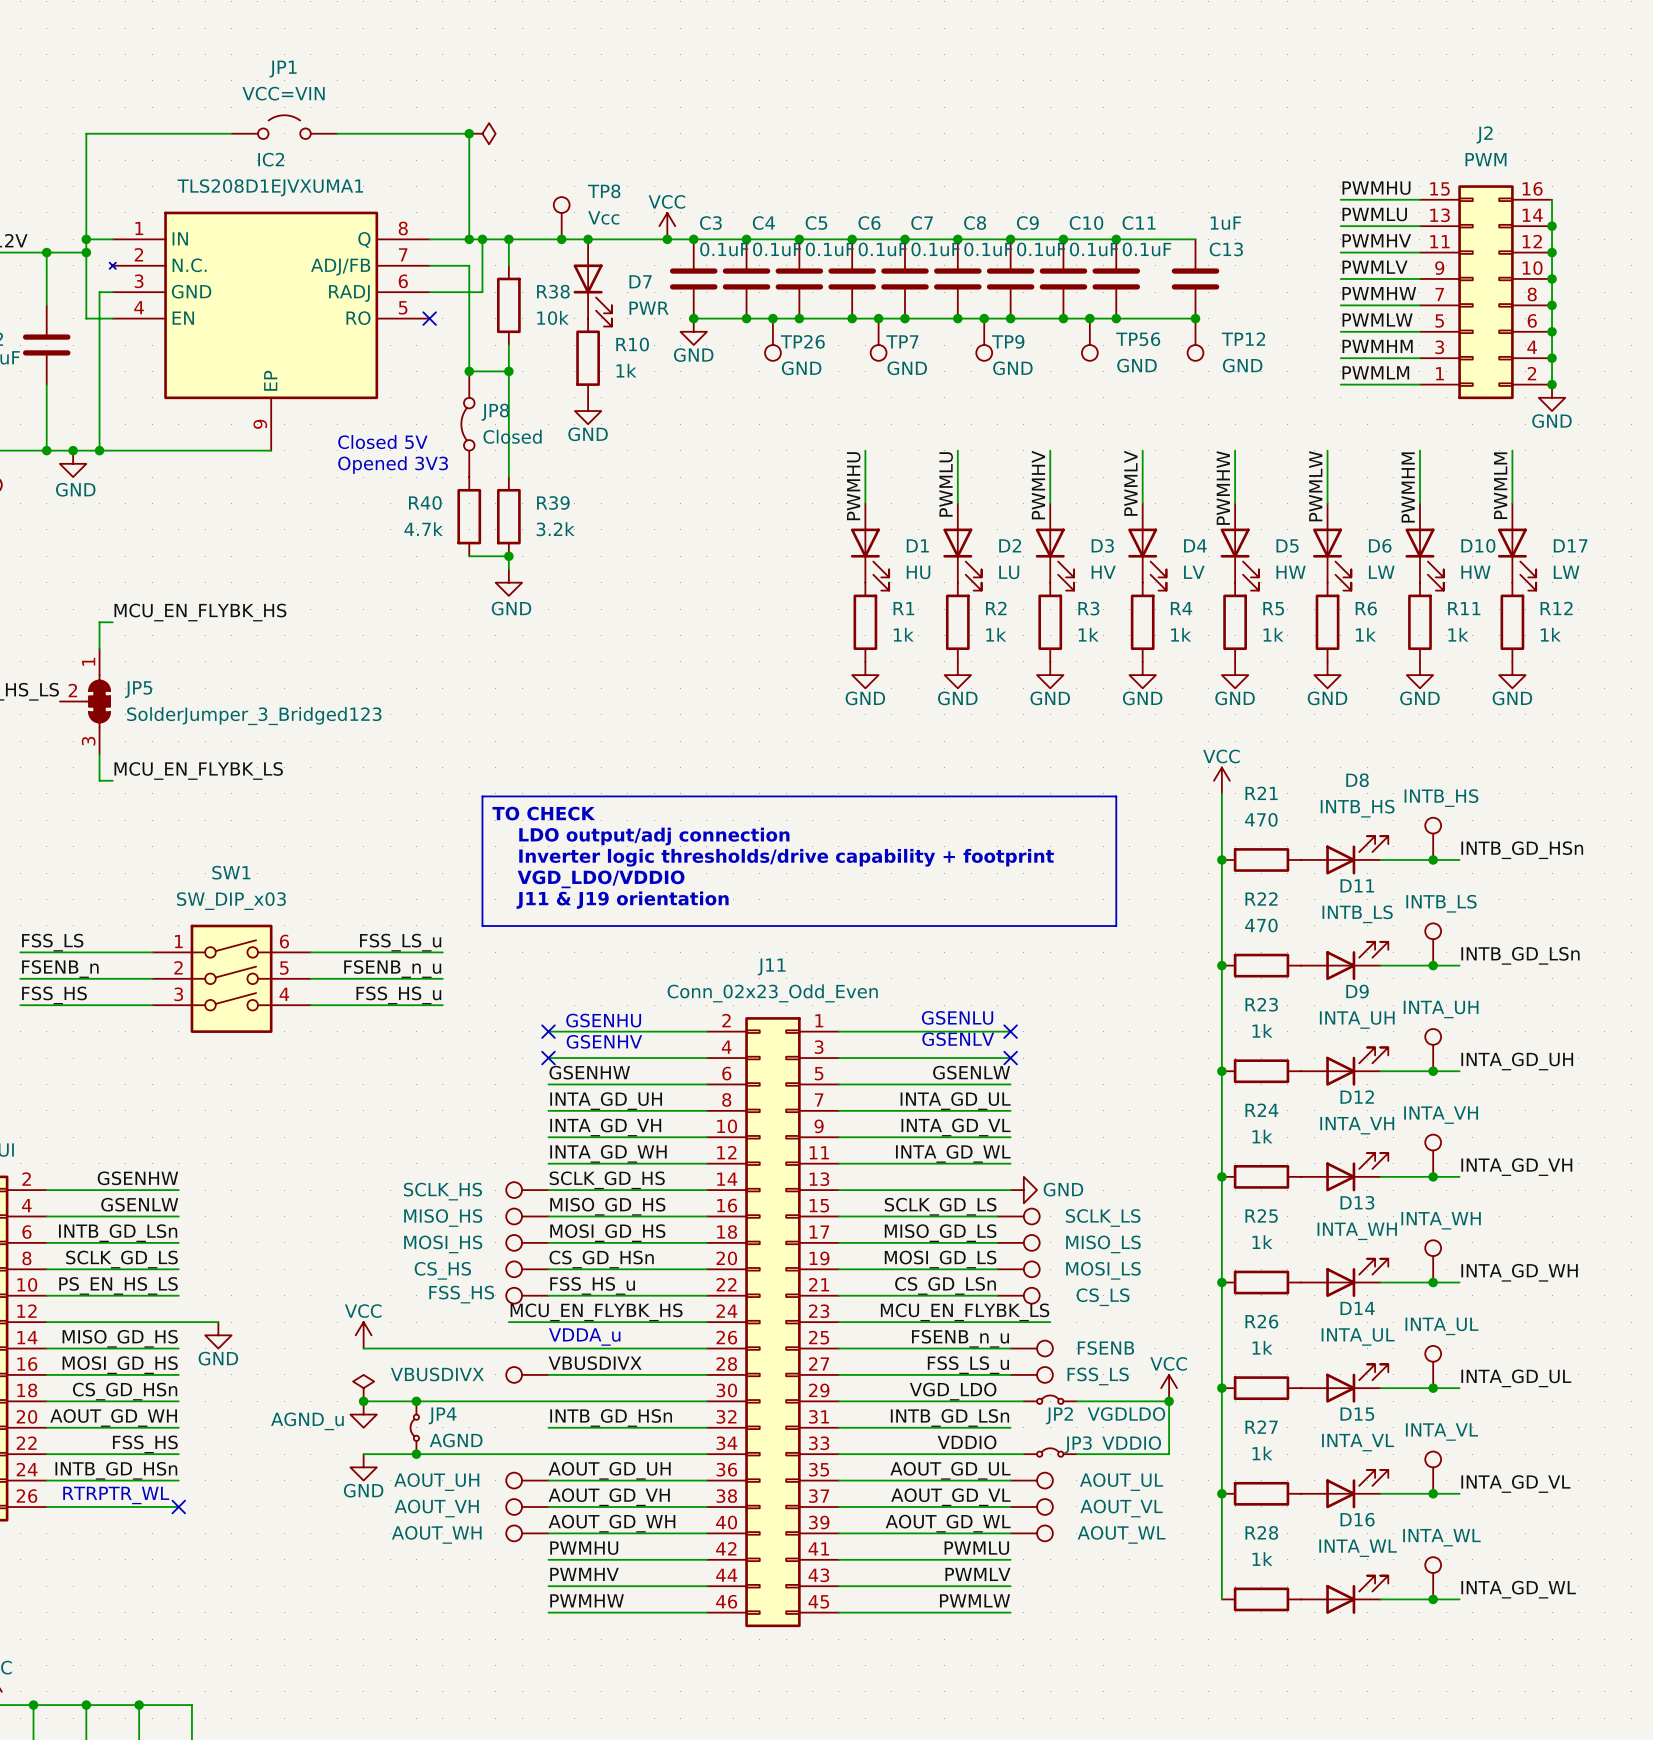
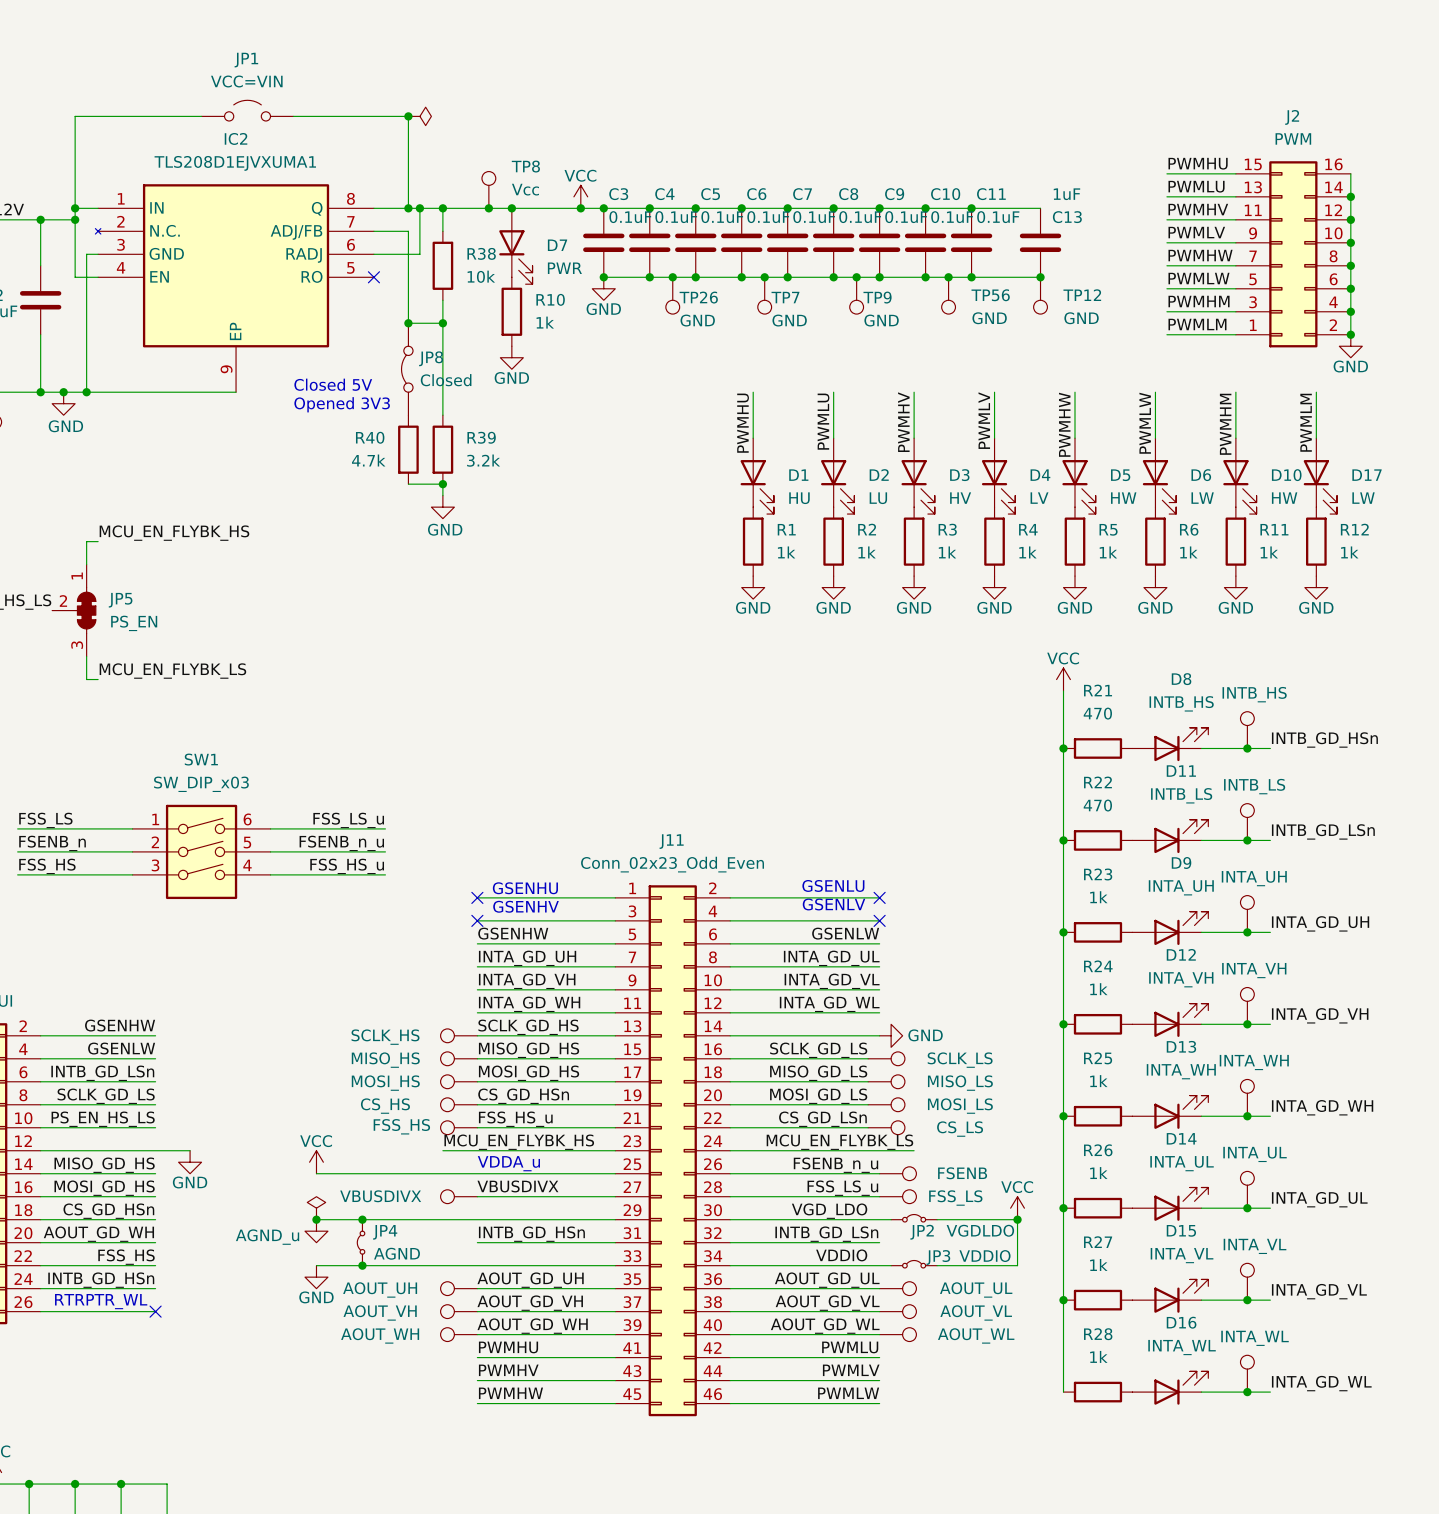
JP5 value: SolderJumper_3_Bridged123 (254, 716) -> PS_EN (134, 623)
line: (482, 796) (1116, 796) (1116, 925) (482, 925) (482, 796) -> none
text: TO CHECK (543, 813) -> none
text: LDO output/adj connection (654, 836) -> none
text: Inverter logic thresholds/drive capability + footprint (786, 857) -> none
text: VGD_LDO/VDDIO (601, 879) -> none
text: J11 & J19 orientation (622, 900) -> none
J11 flip: as is (772, 1322) -> left-right (672, 1150)

